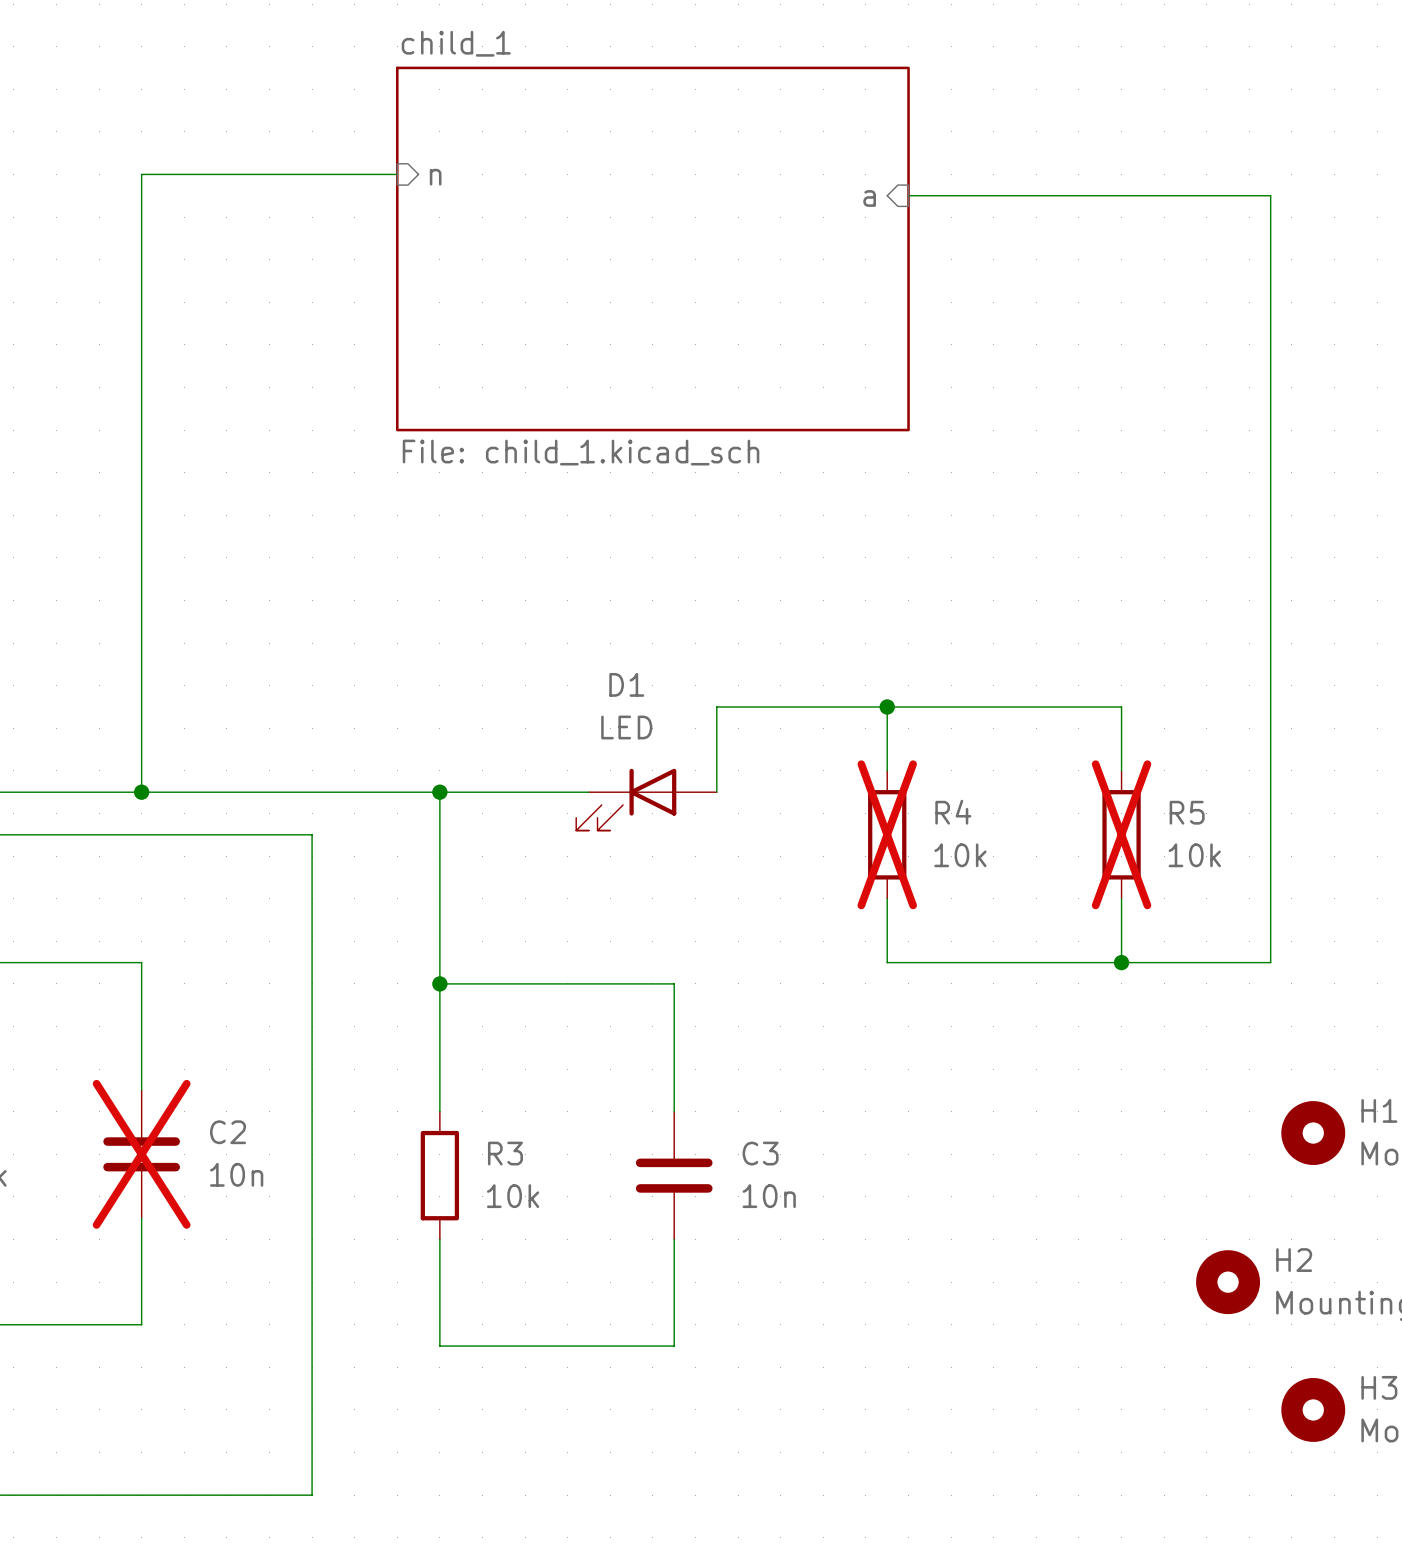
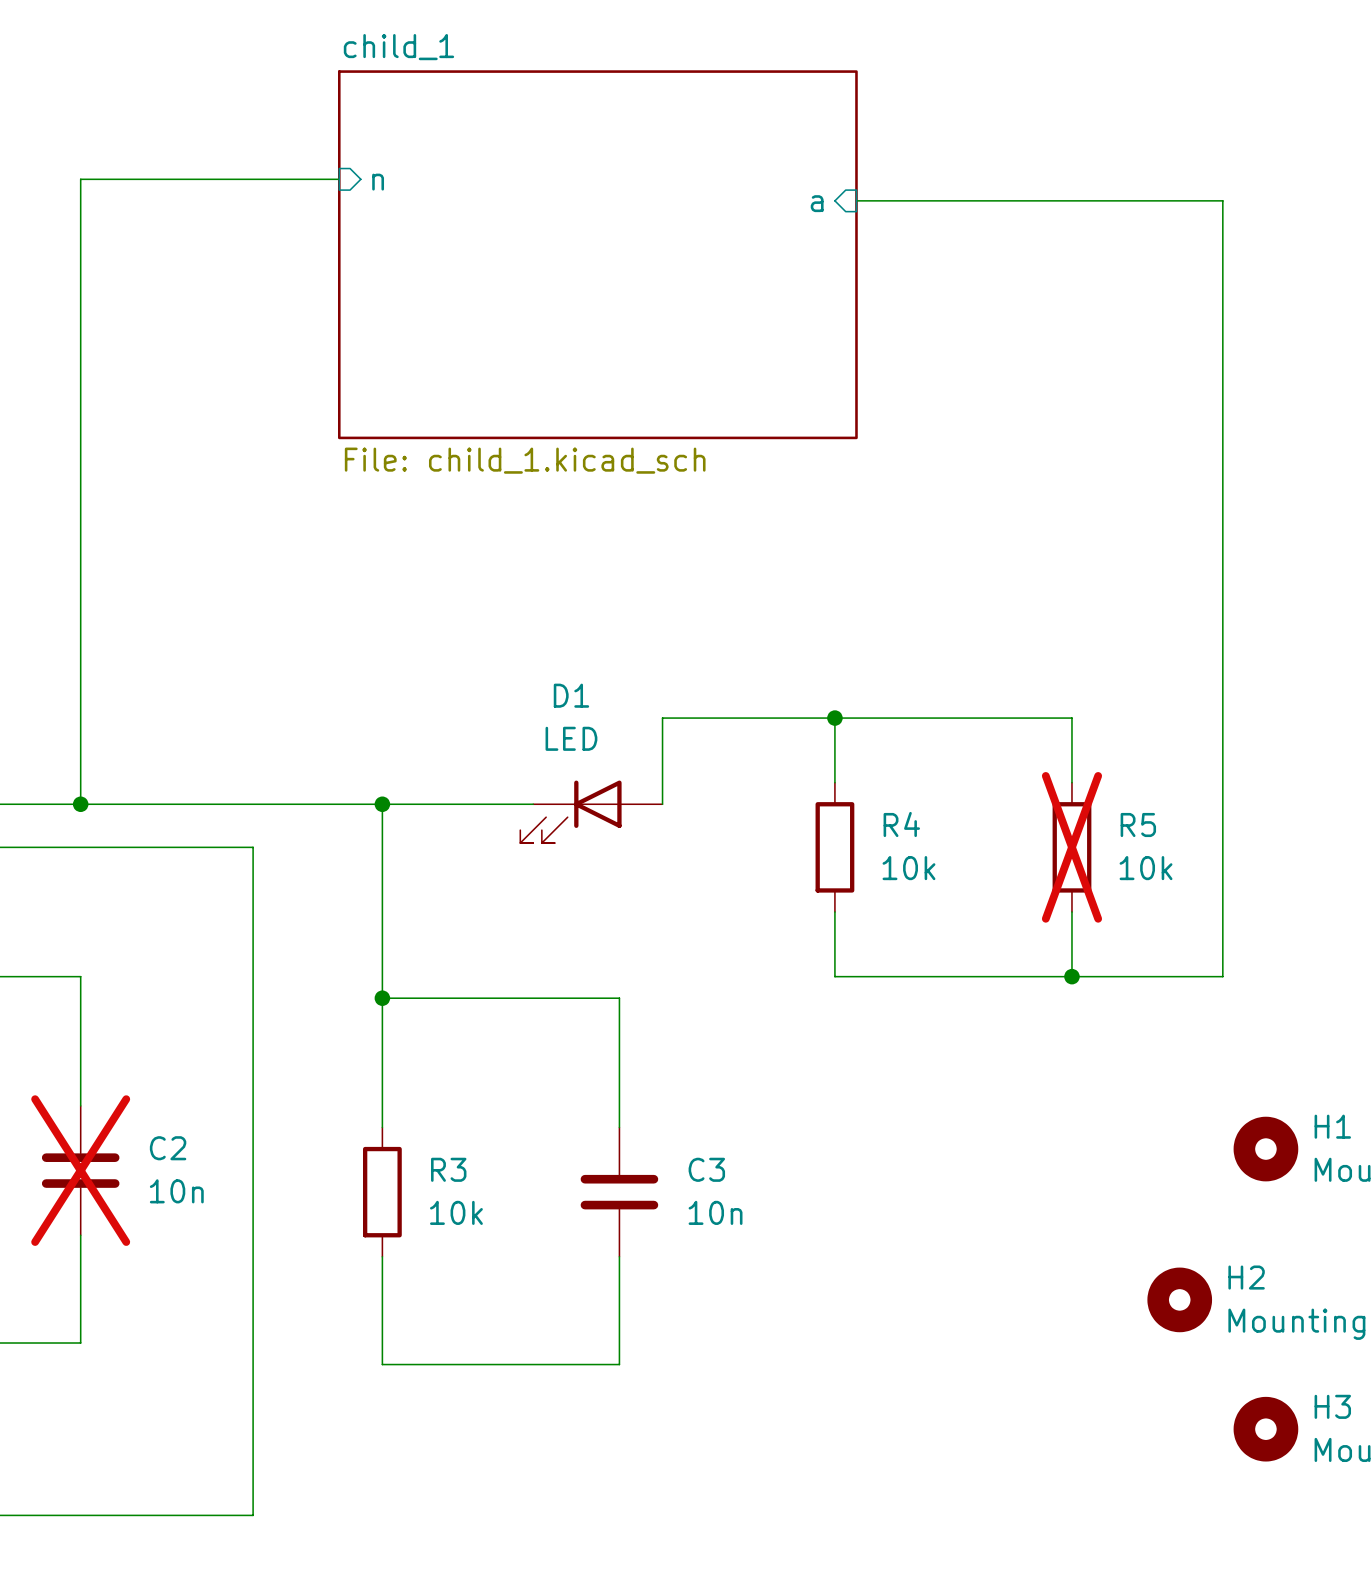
R4 do-not-place cross: (887, 834) -> none

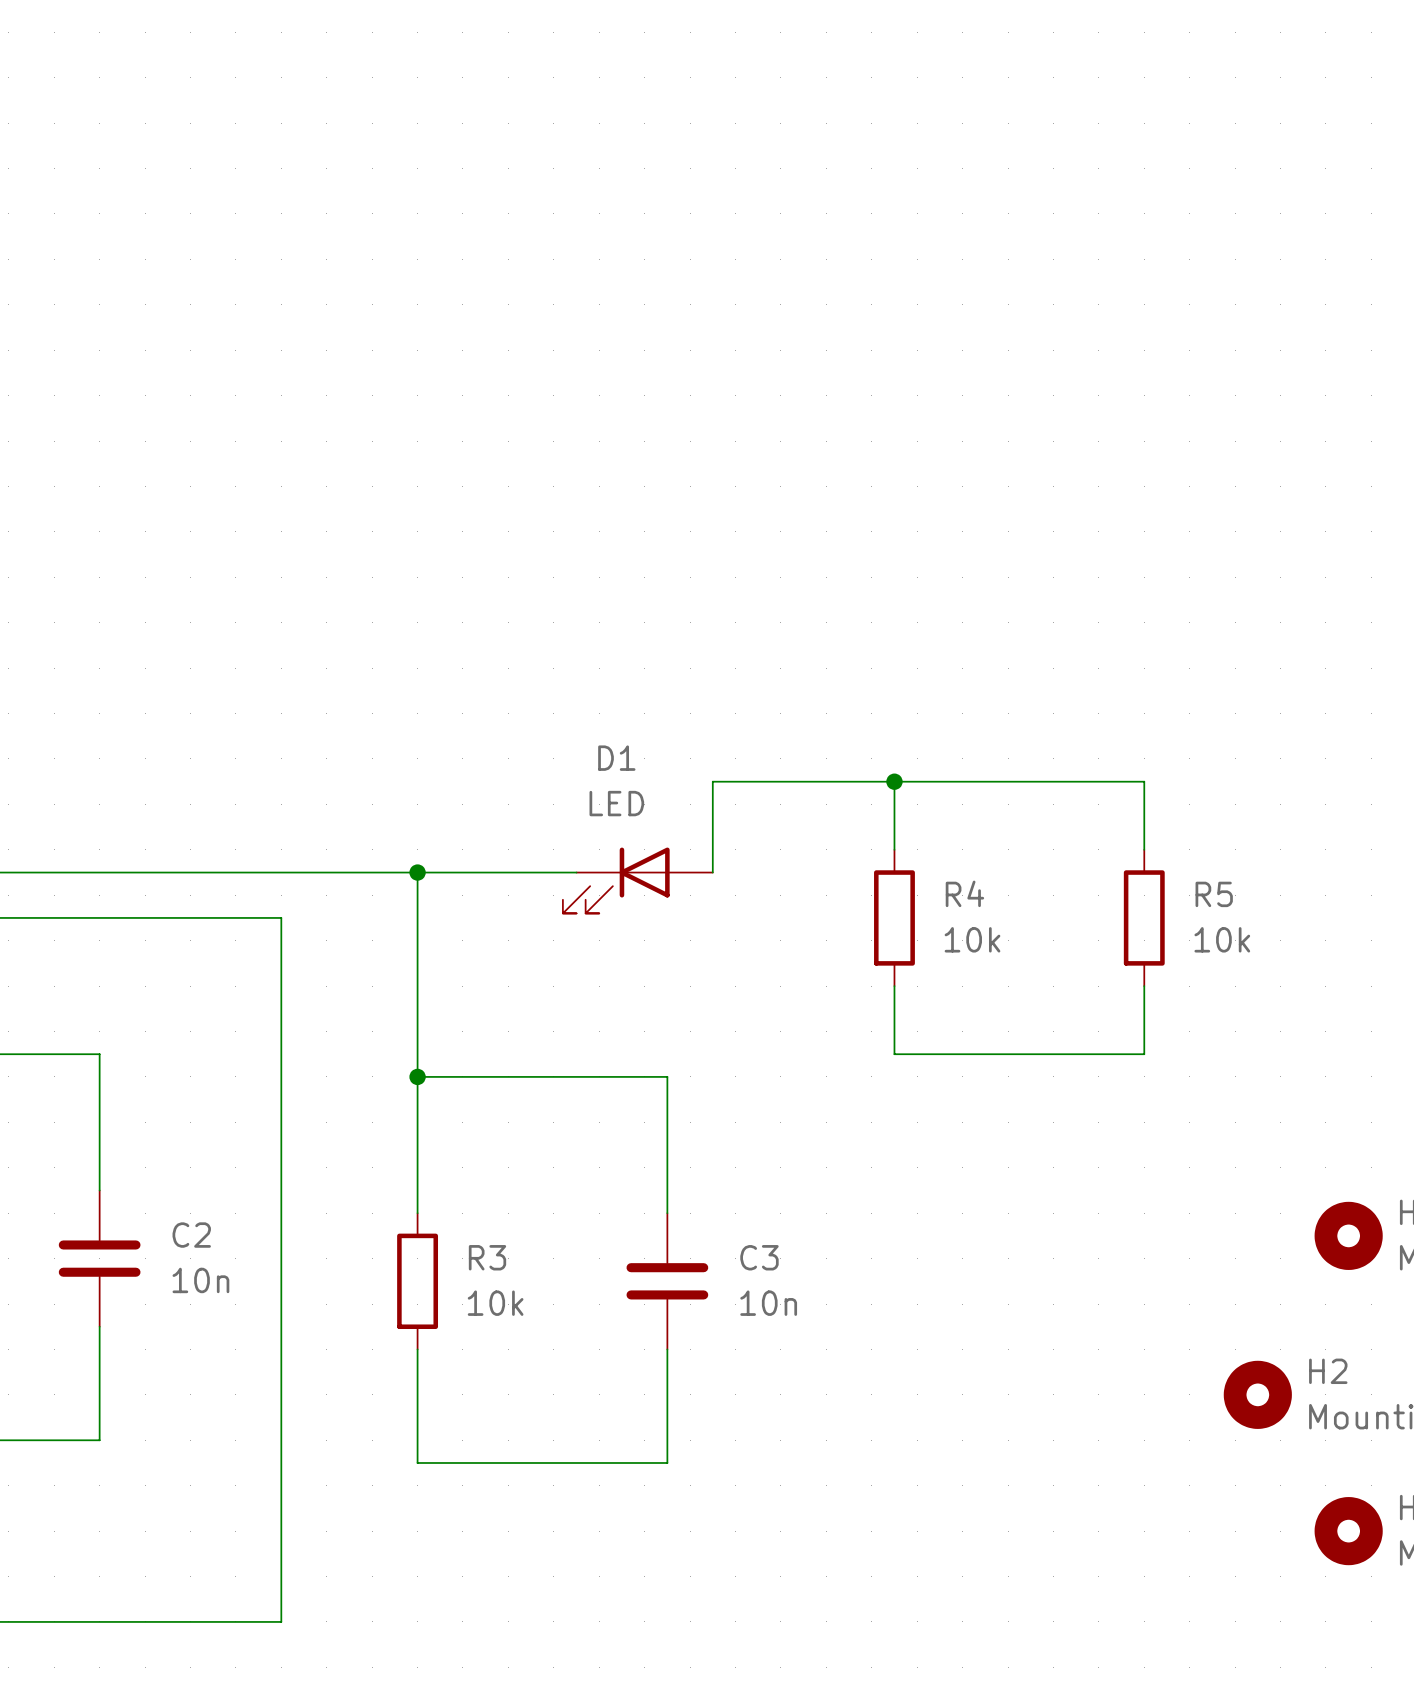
wire: (339, 179) (80, 179) (80, 804) -> none
sheet pin: n (378, 182) -> none
wire: (856, 200) (1222, 200) (1222, 976) (1071, 976) -> none
sheet pin: a (817, 203) -> none
sheet child_1: File: child_1.kicad_sch (597, 254) -> none
junction: (80, 804) -> none
R5 do-not-place cross: (1071, 847) -> none
junction: (1071, 976) -> none
C2 do-not-place cross: (80, 1170) -> none

